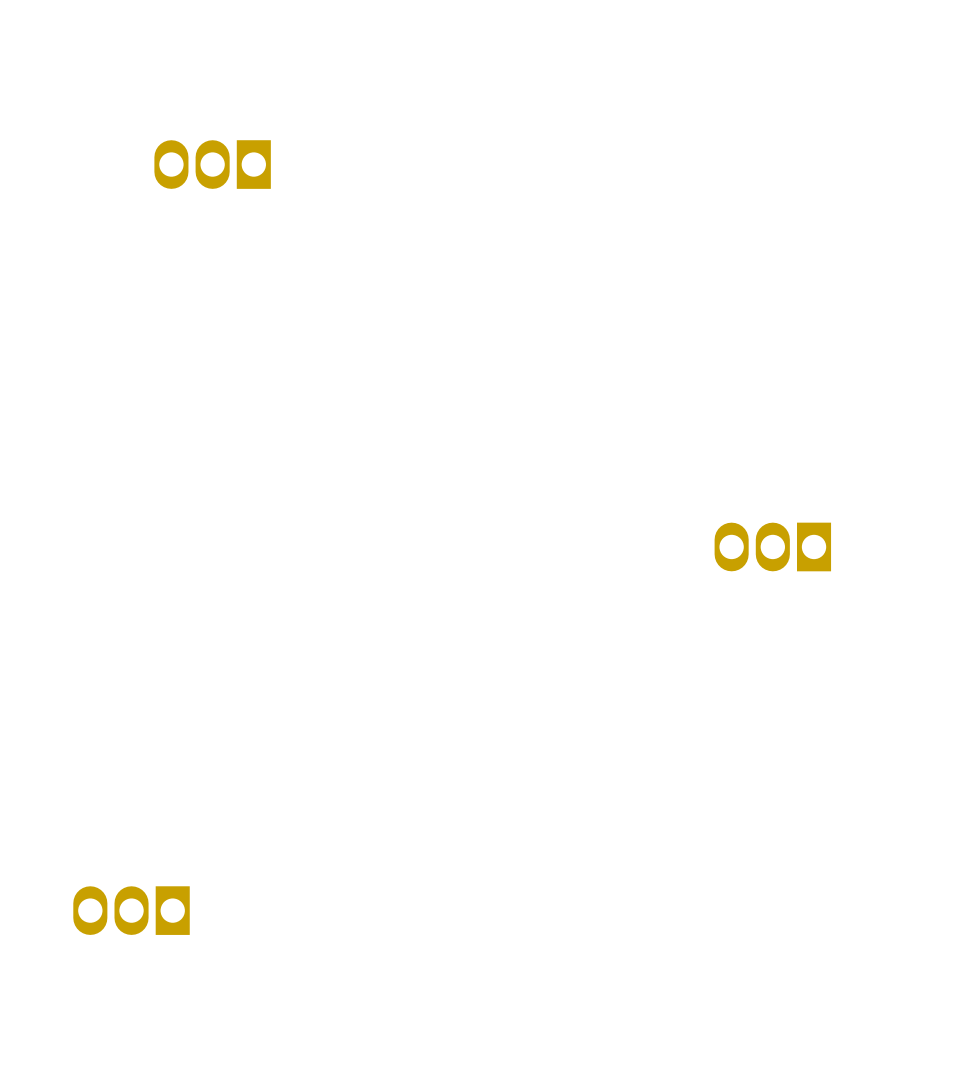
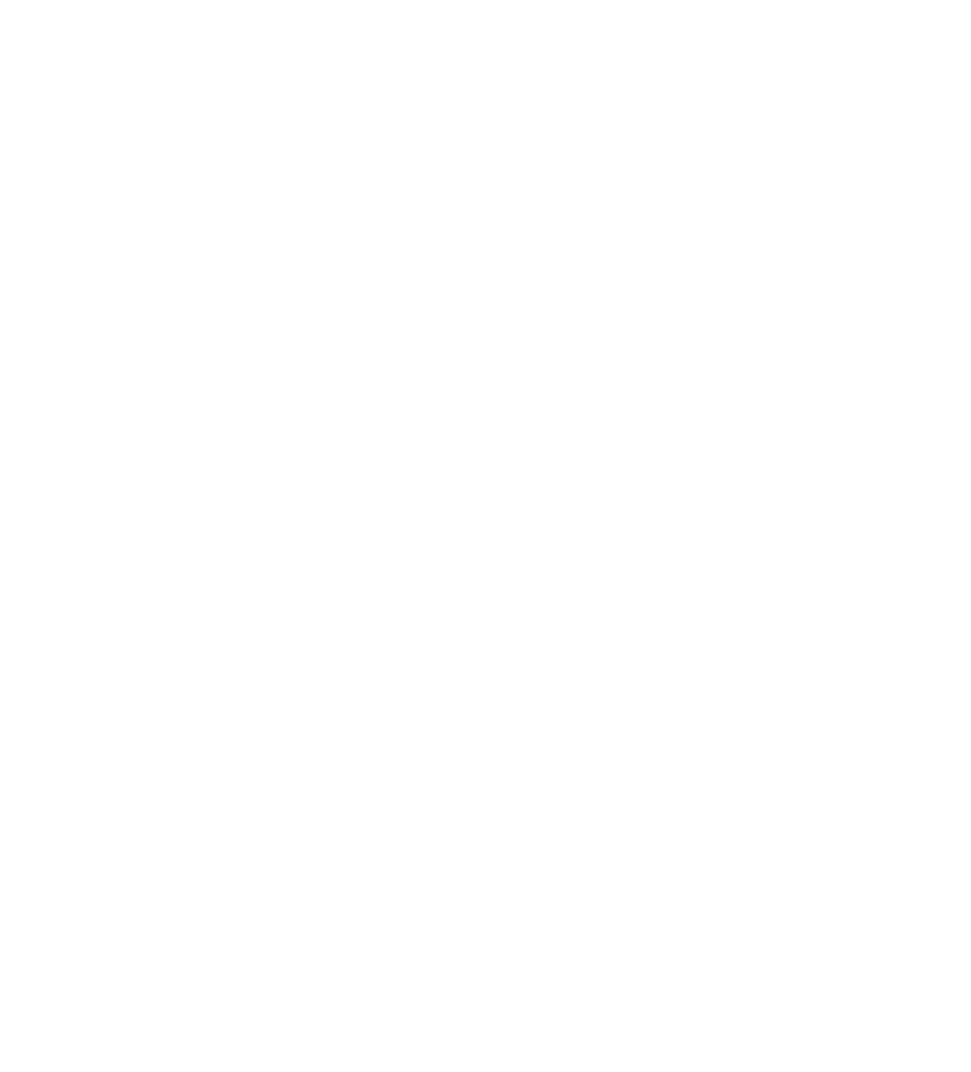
part: (212, 164) -> none
part: (772, 546) -> none
part: (131, 910) -> none

